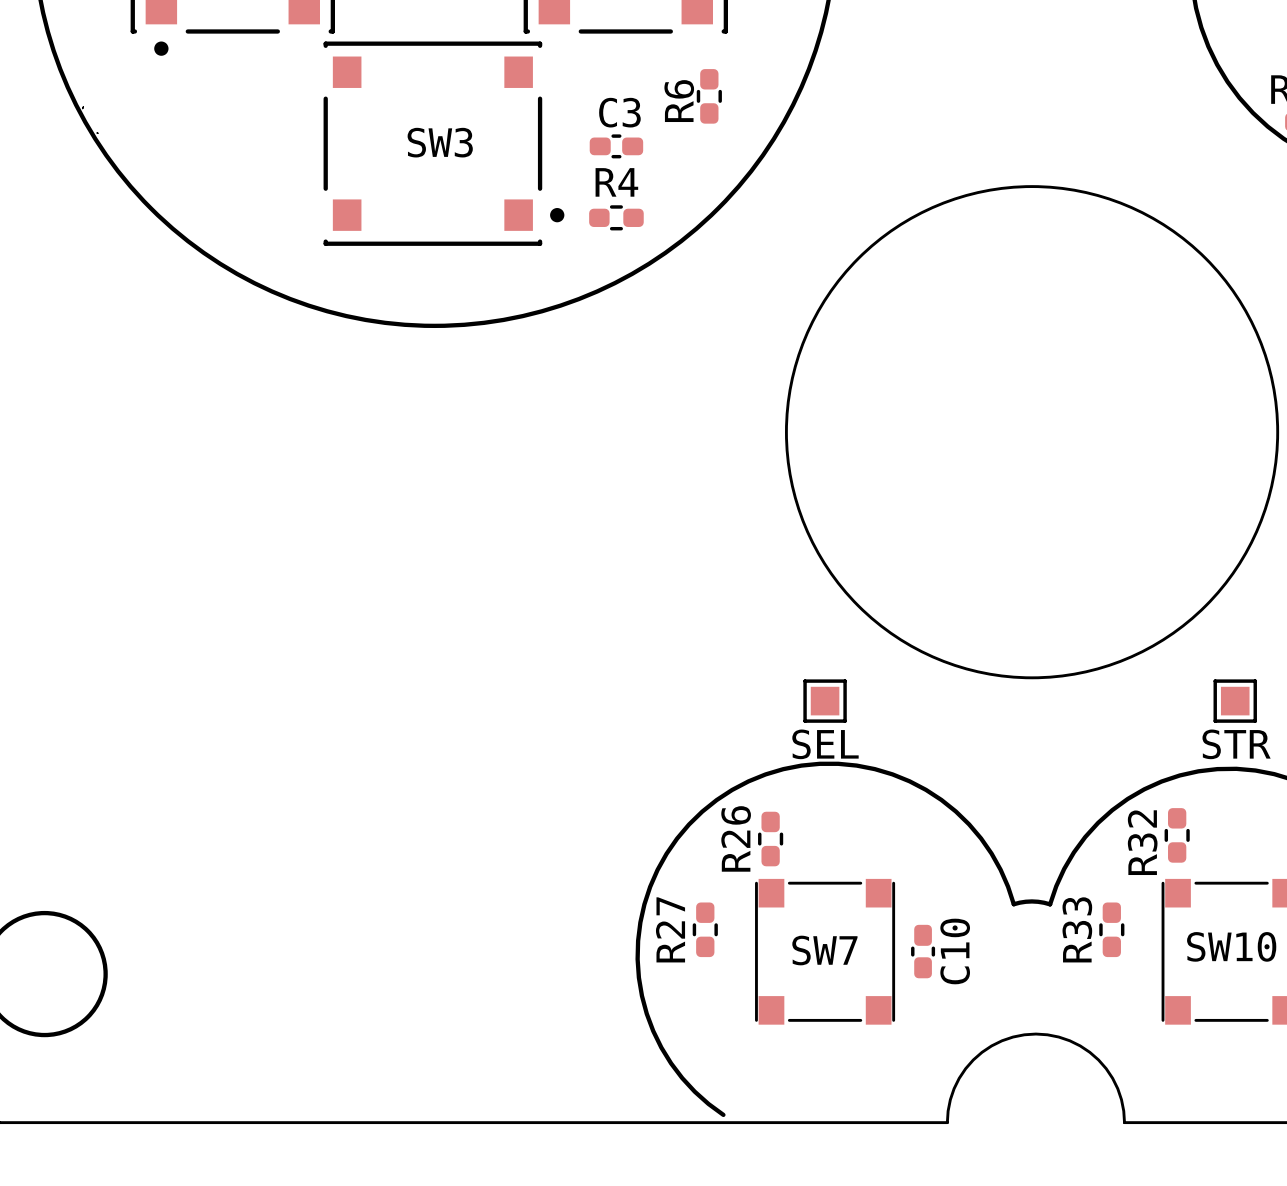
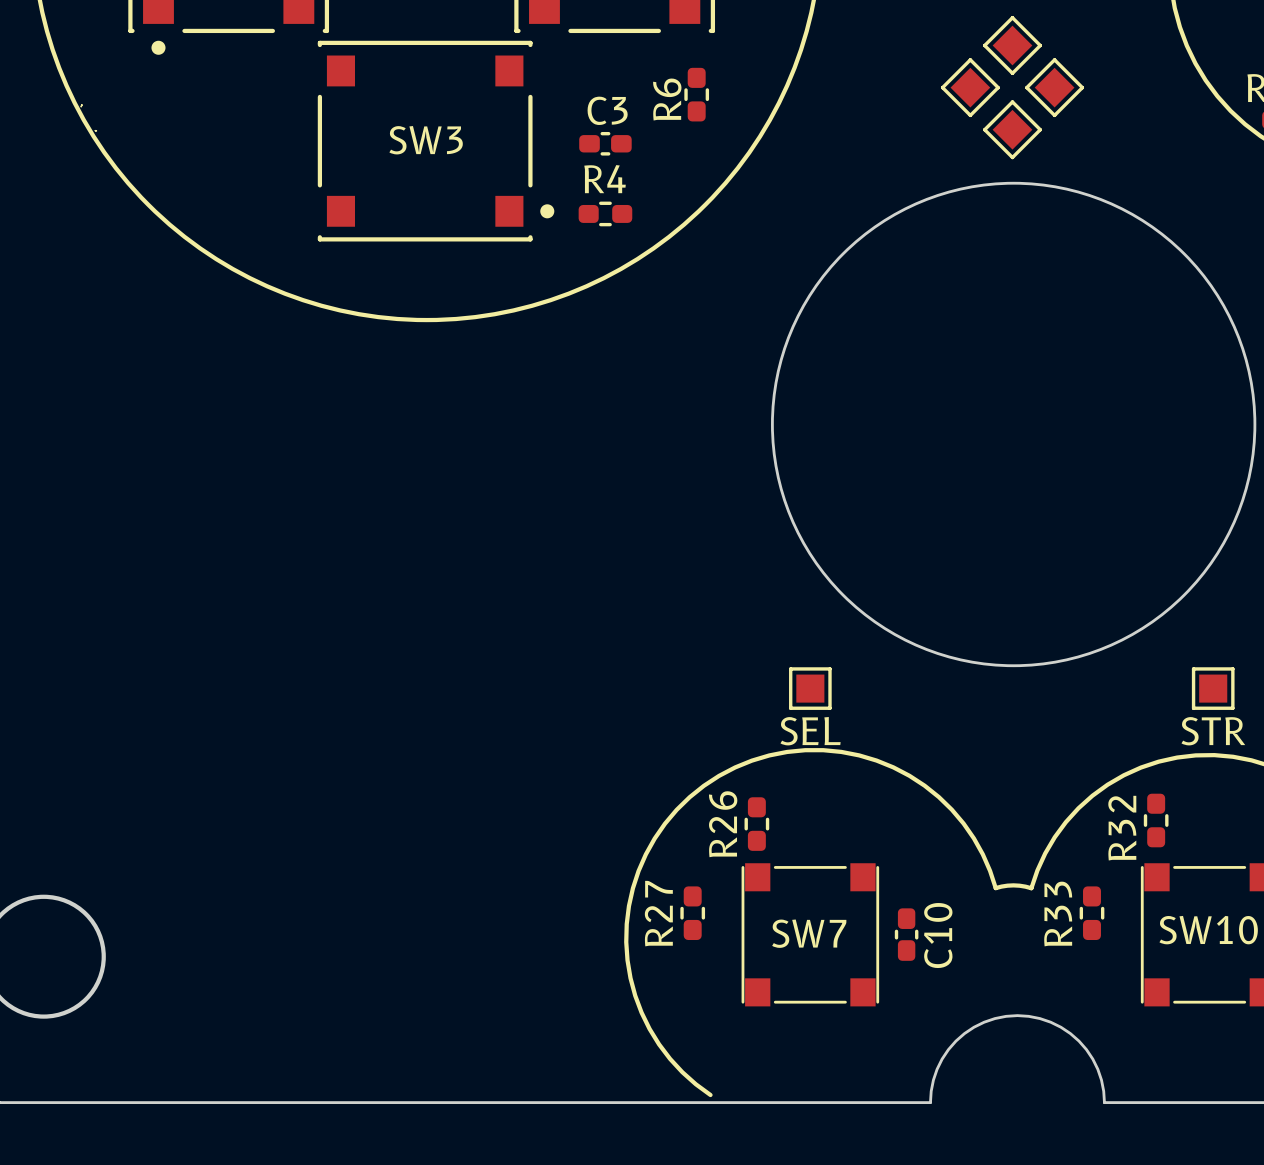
part: none -> (1012, 45)
part: none -> (970, 87)
part: none -> (1054, 87)
part: none -> (1012, 129)

